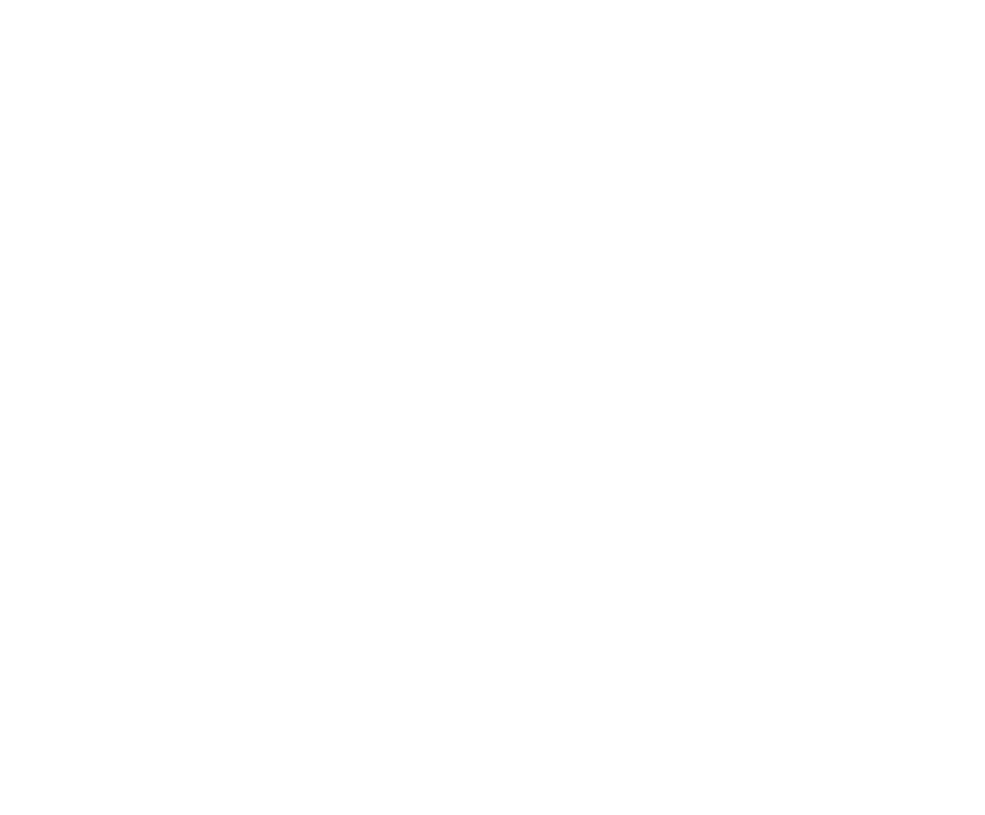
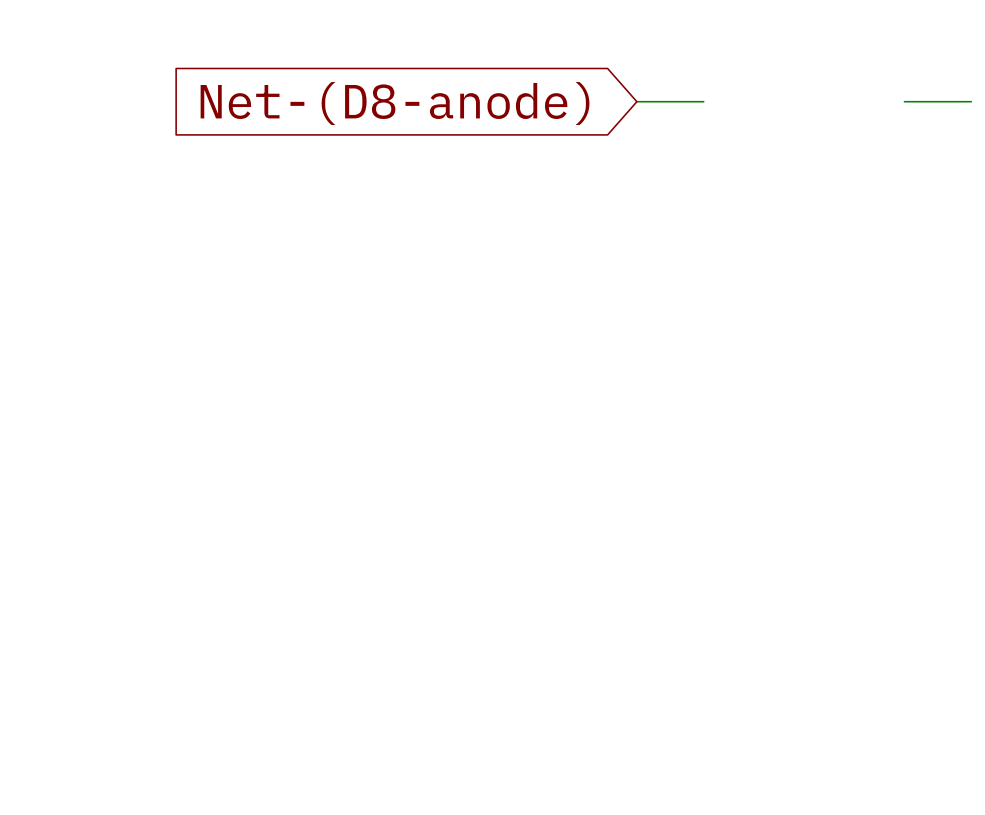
wire: none -> (636, 101) (703, 101)
wire: none -> (904, 101) (971, 101)
global label: none -> Net-(D8-anode) (395, 103)

